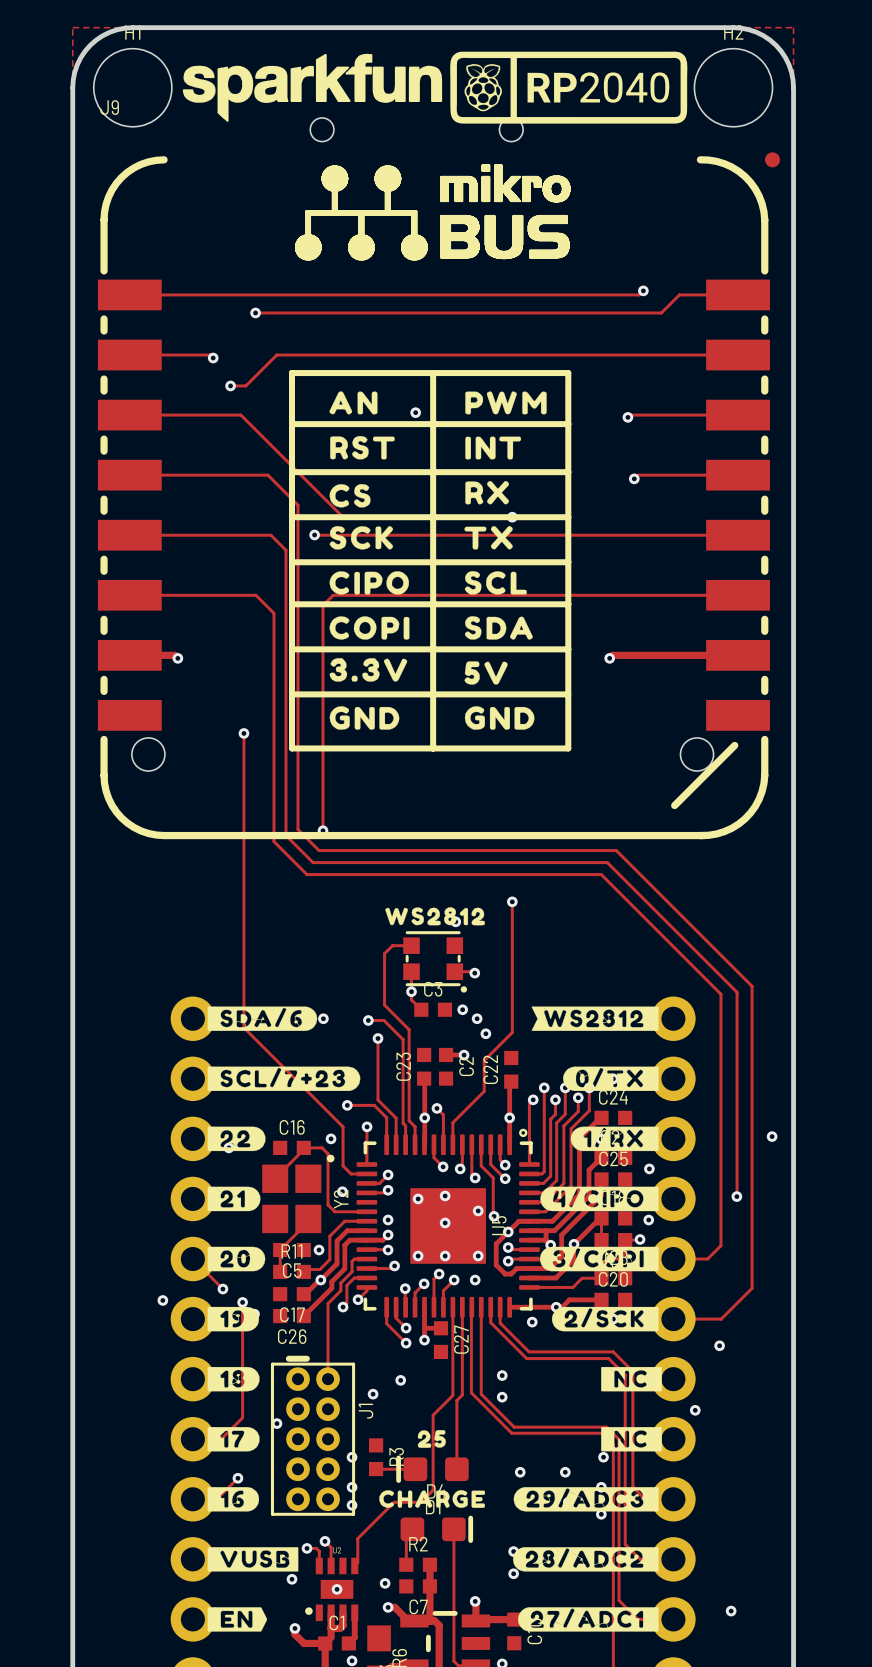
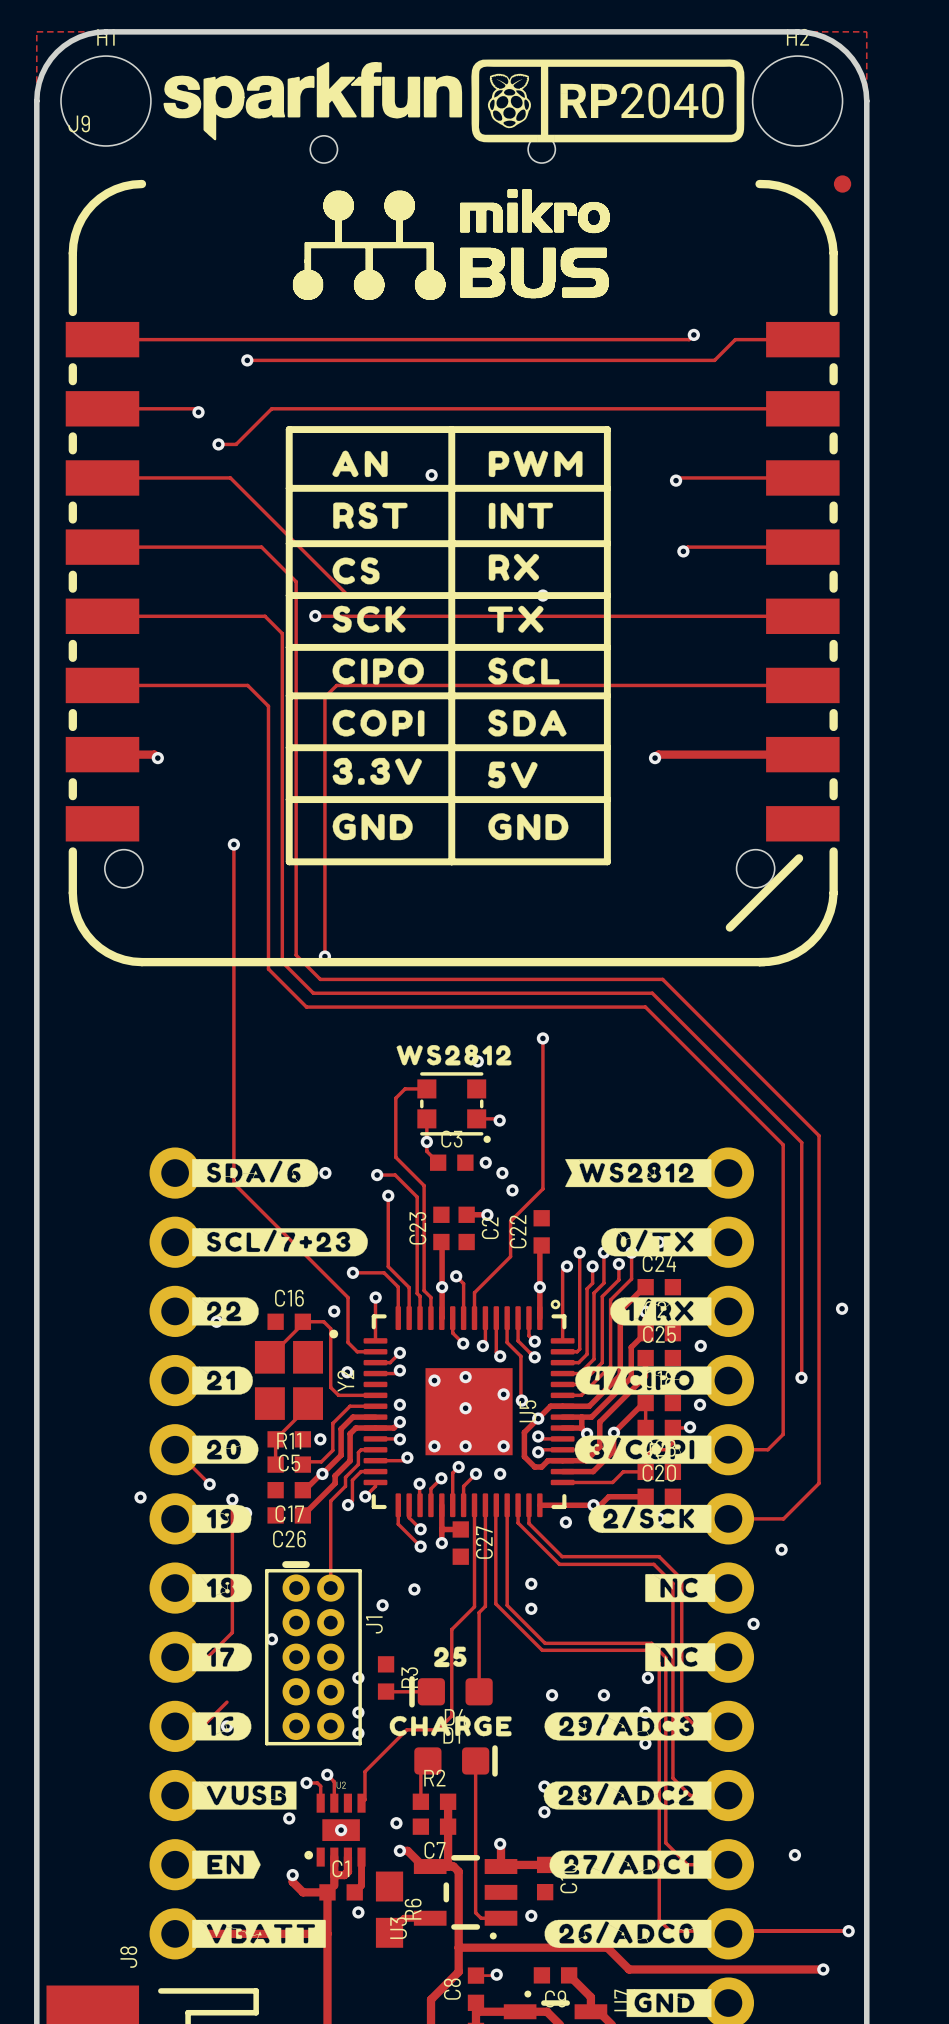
via position: (237, 1478) -> (226, 1726)

